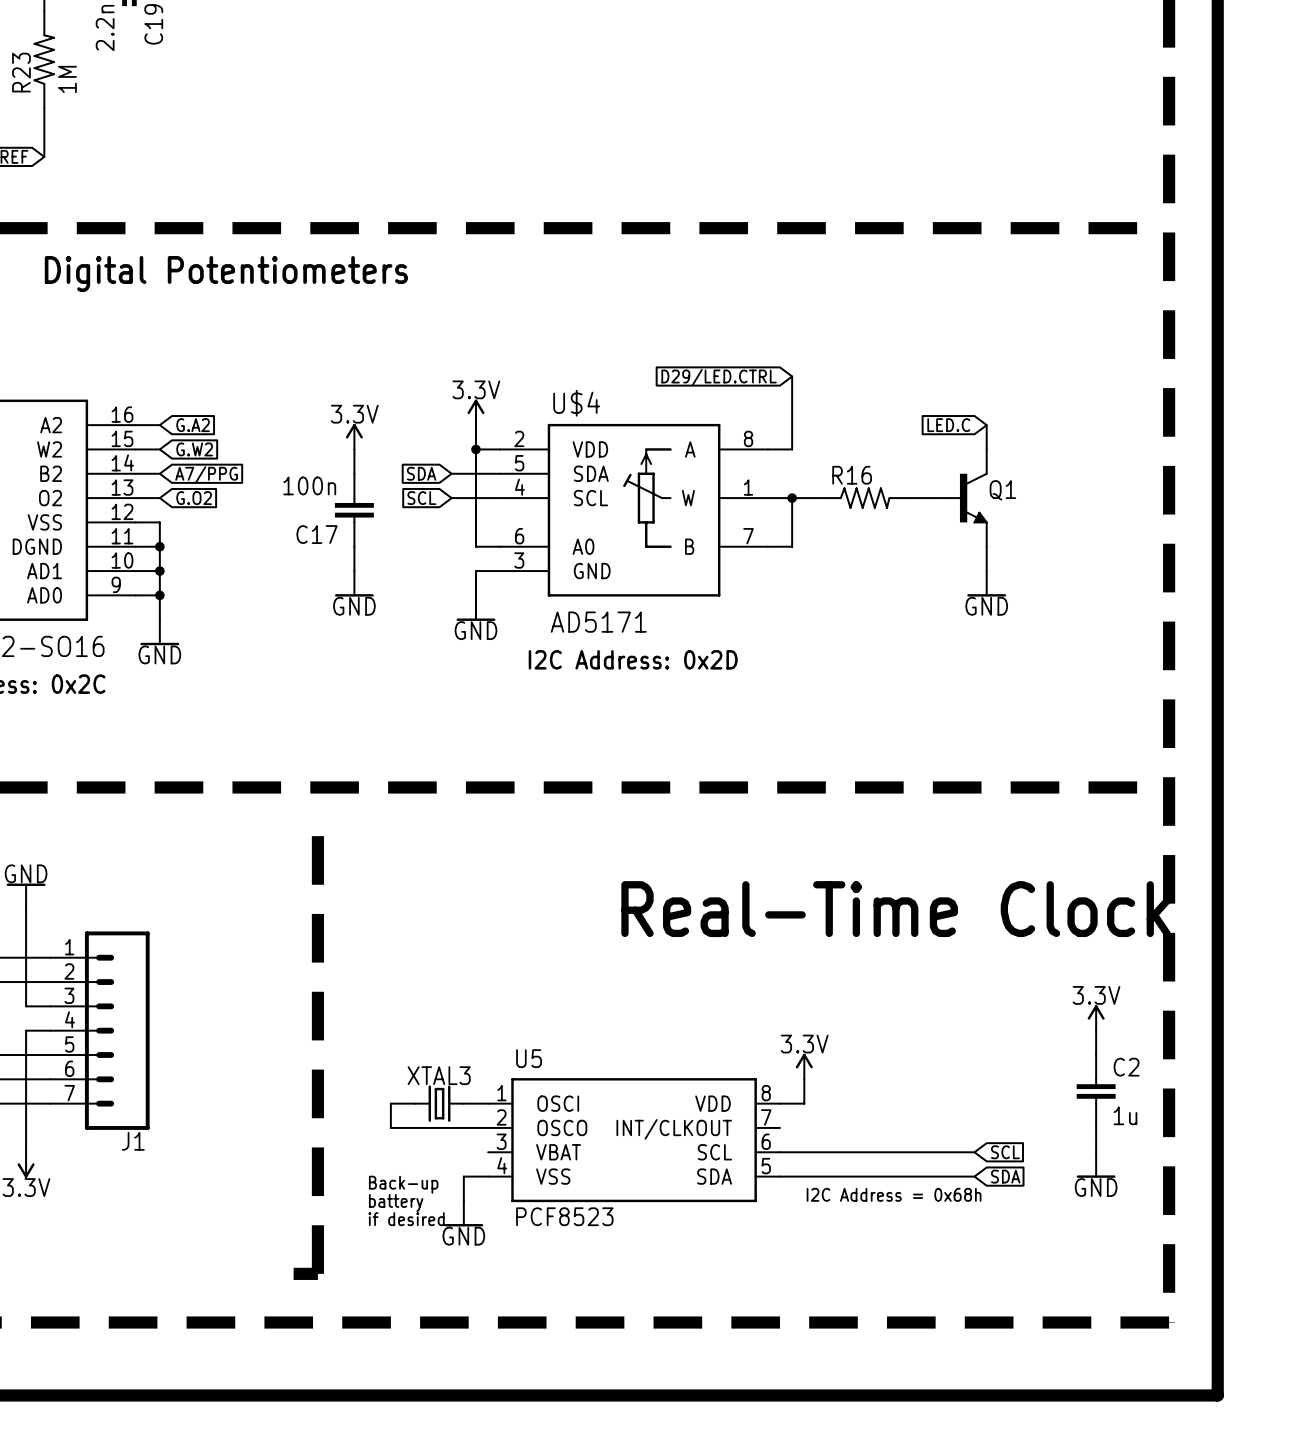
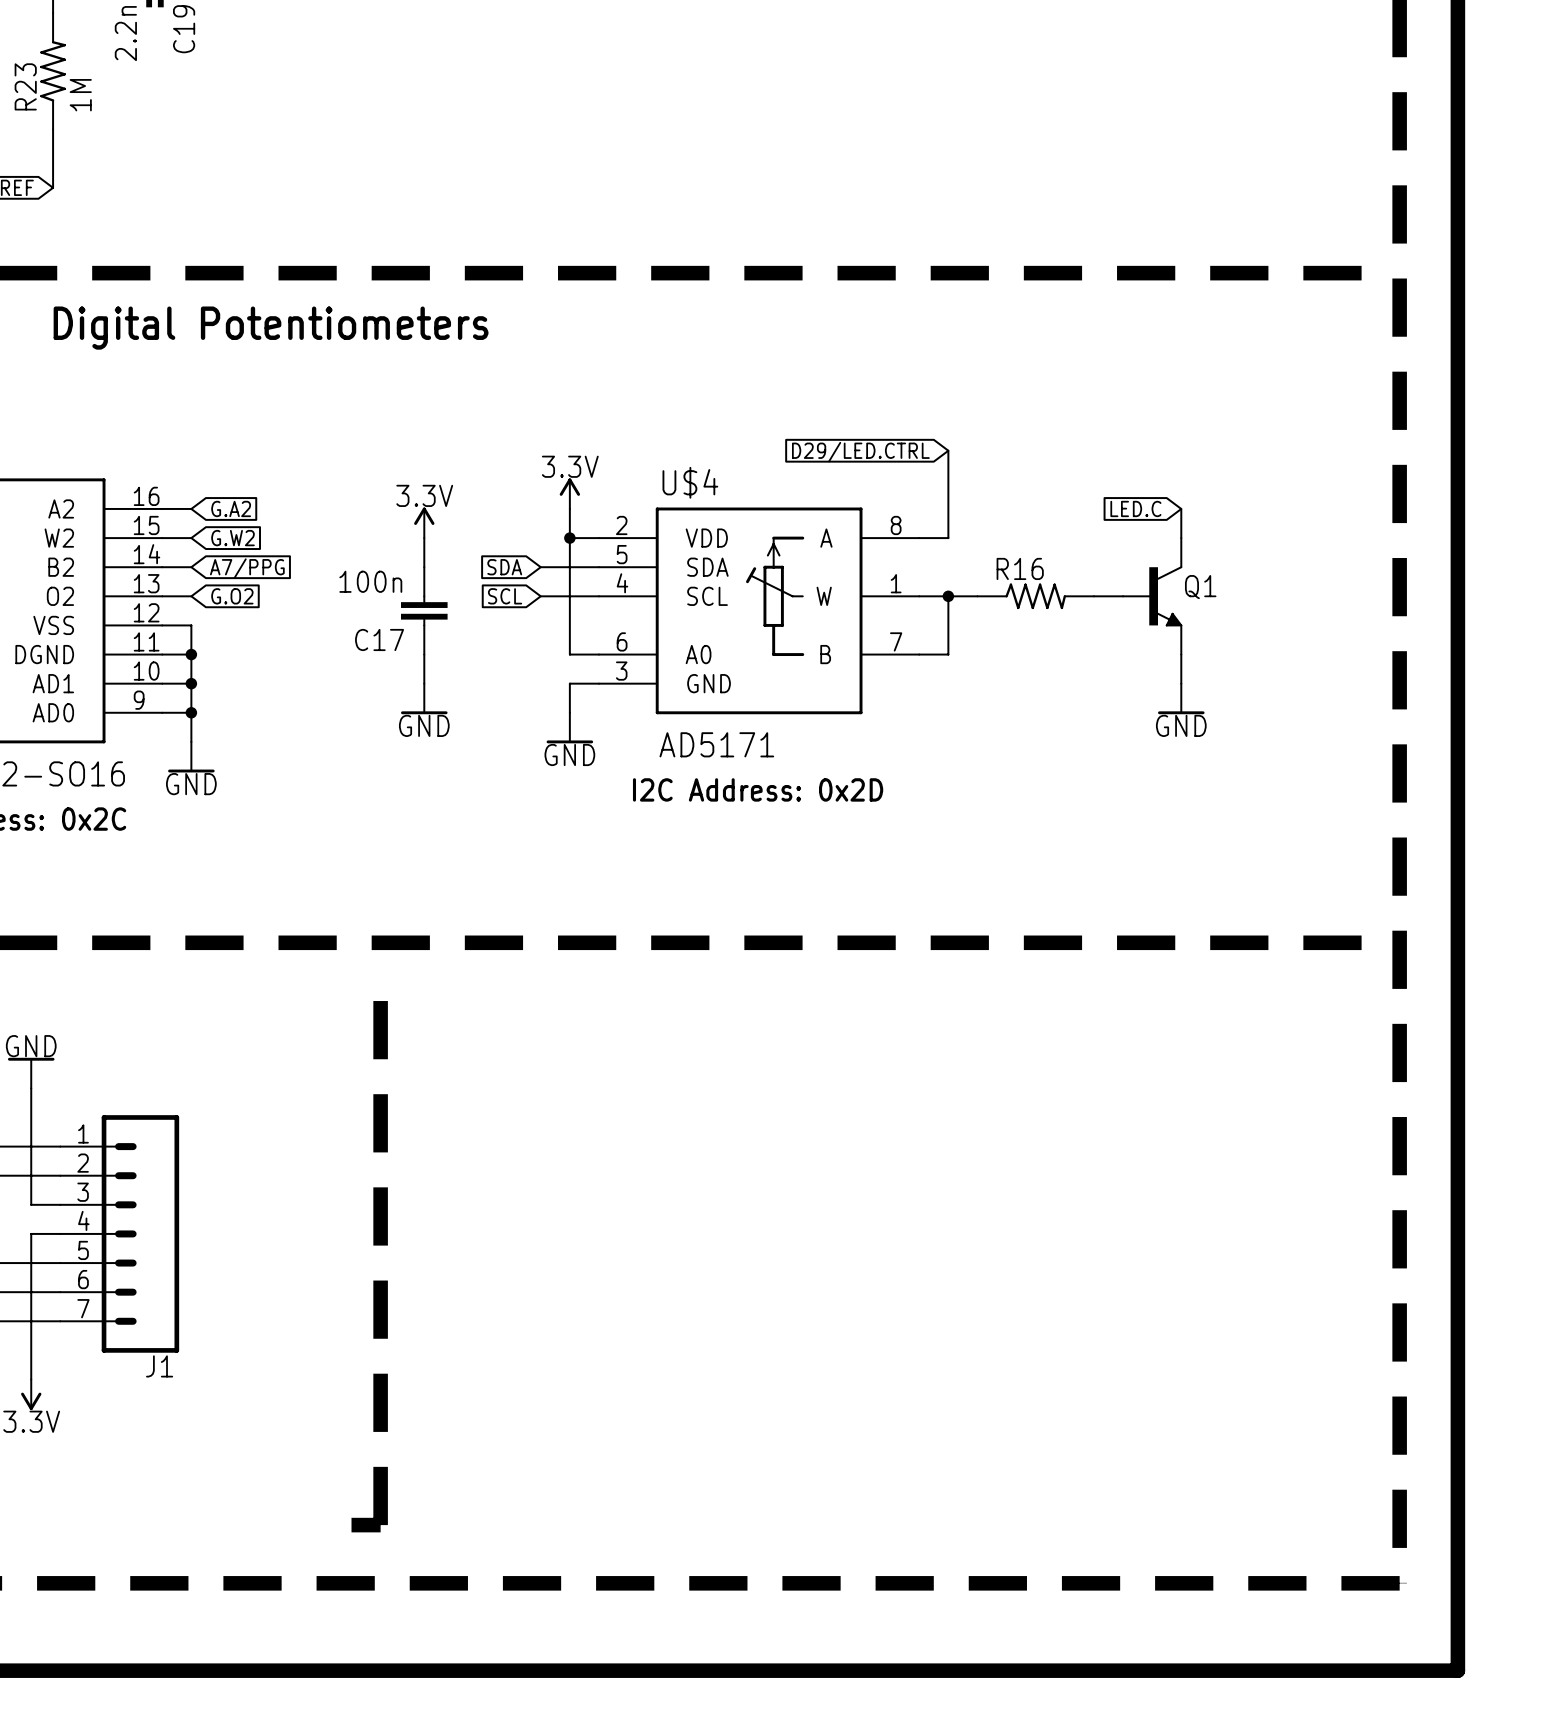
text: Real-Time Clock (895, 909) -> none
power symbol: 3.3V (1096, 1017) -> none
wire: (1096, 1030) (1096, 1055) -> none
power symbol: 3.3V (804, 1066) -> none
wire: (804, 1079) (804, 1103) (779, 1103) -> none
C2: 1u (1096, 1091) -> none
wire: (415, 1103) (390, 1103) (390, 1127) (488, 1127) -> none
XTAL3: (439, 1103) -> none
wire: (463, 1103) (488, 1103) -> none
wire: (1096, 1127) (1096, 1152) -> none
U5: PCF8523 (634, 1140) -> none
wire: (779, 1152) (974, 1152) -> none
global label: SCL (1005, 1152) -> none
power symbol: GND (1096, 1165) -> none
wire: (488, 1176) (463, 1176) (463, 1200) -> none
wire: (779, 1176) (974, 1176) -> none
global label: SDA (1005, 1176) -> none
text: Back-up (403, 1184) -> none
text: I2C Address = 0x68h (894, 1194) -> none
text: battery (396, 1202) -> none
power symbol: GND (463, 1213) -> none
text: if desired (406, 1219) -> none

